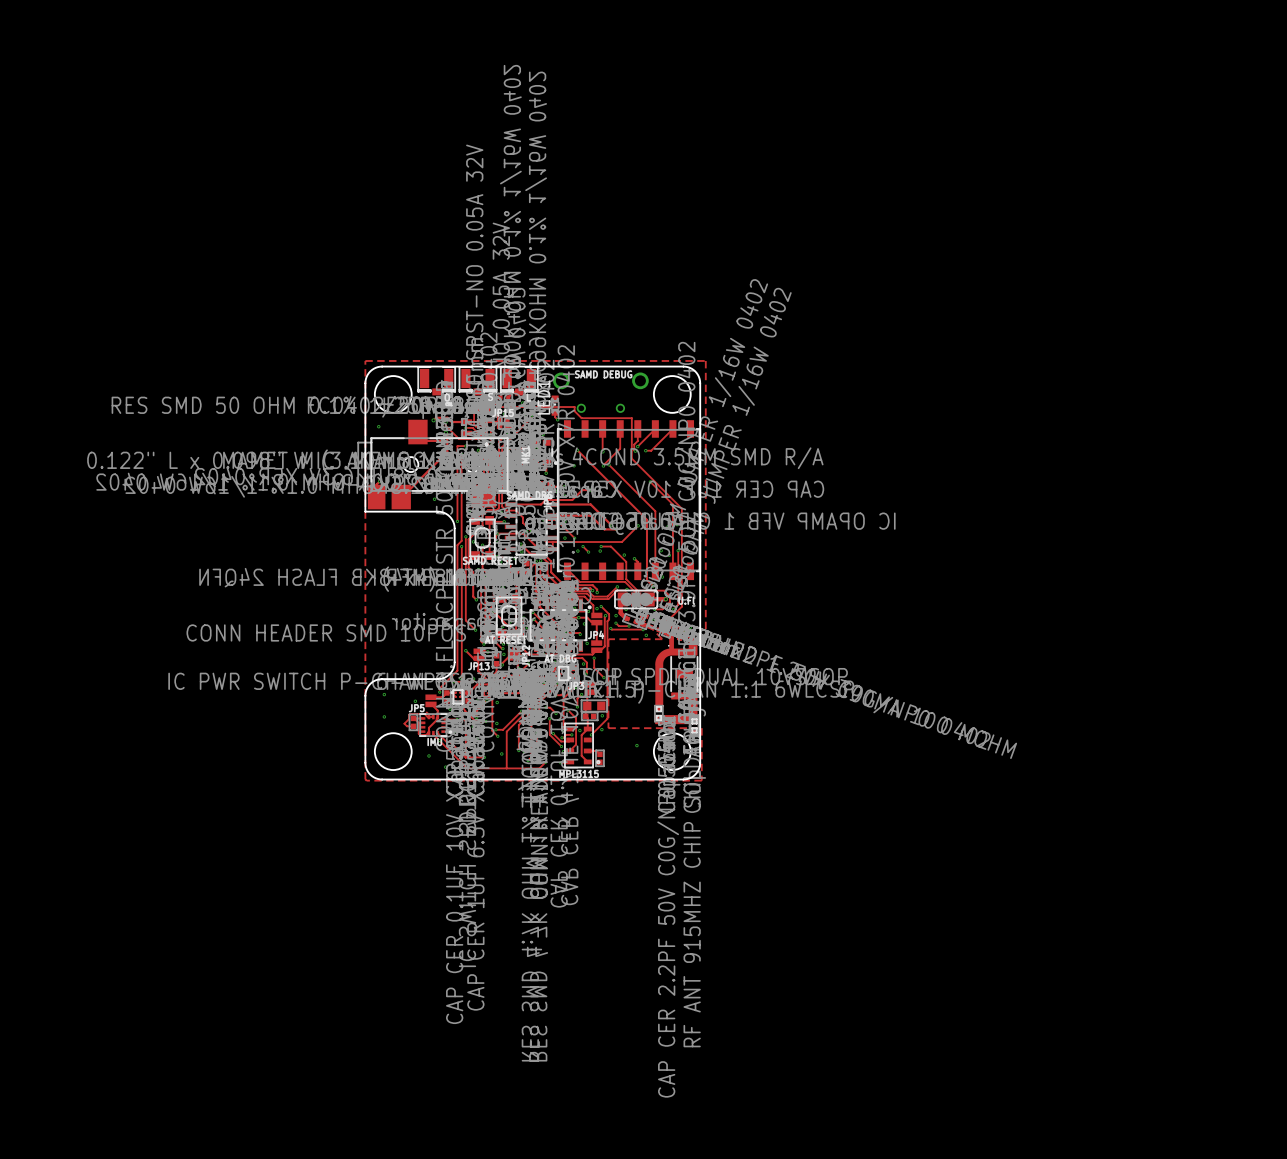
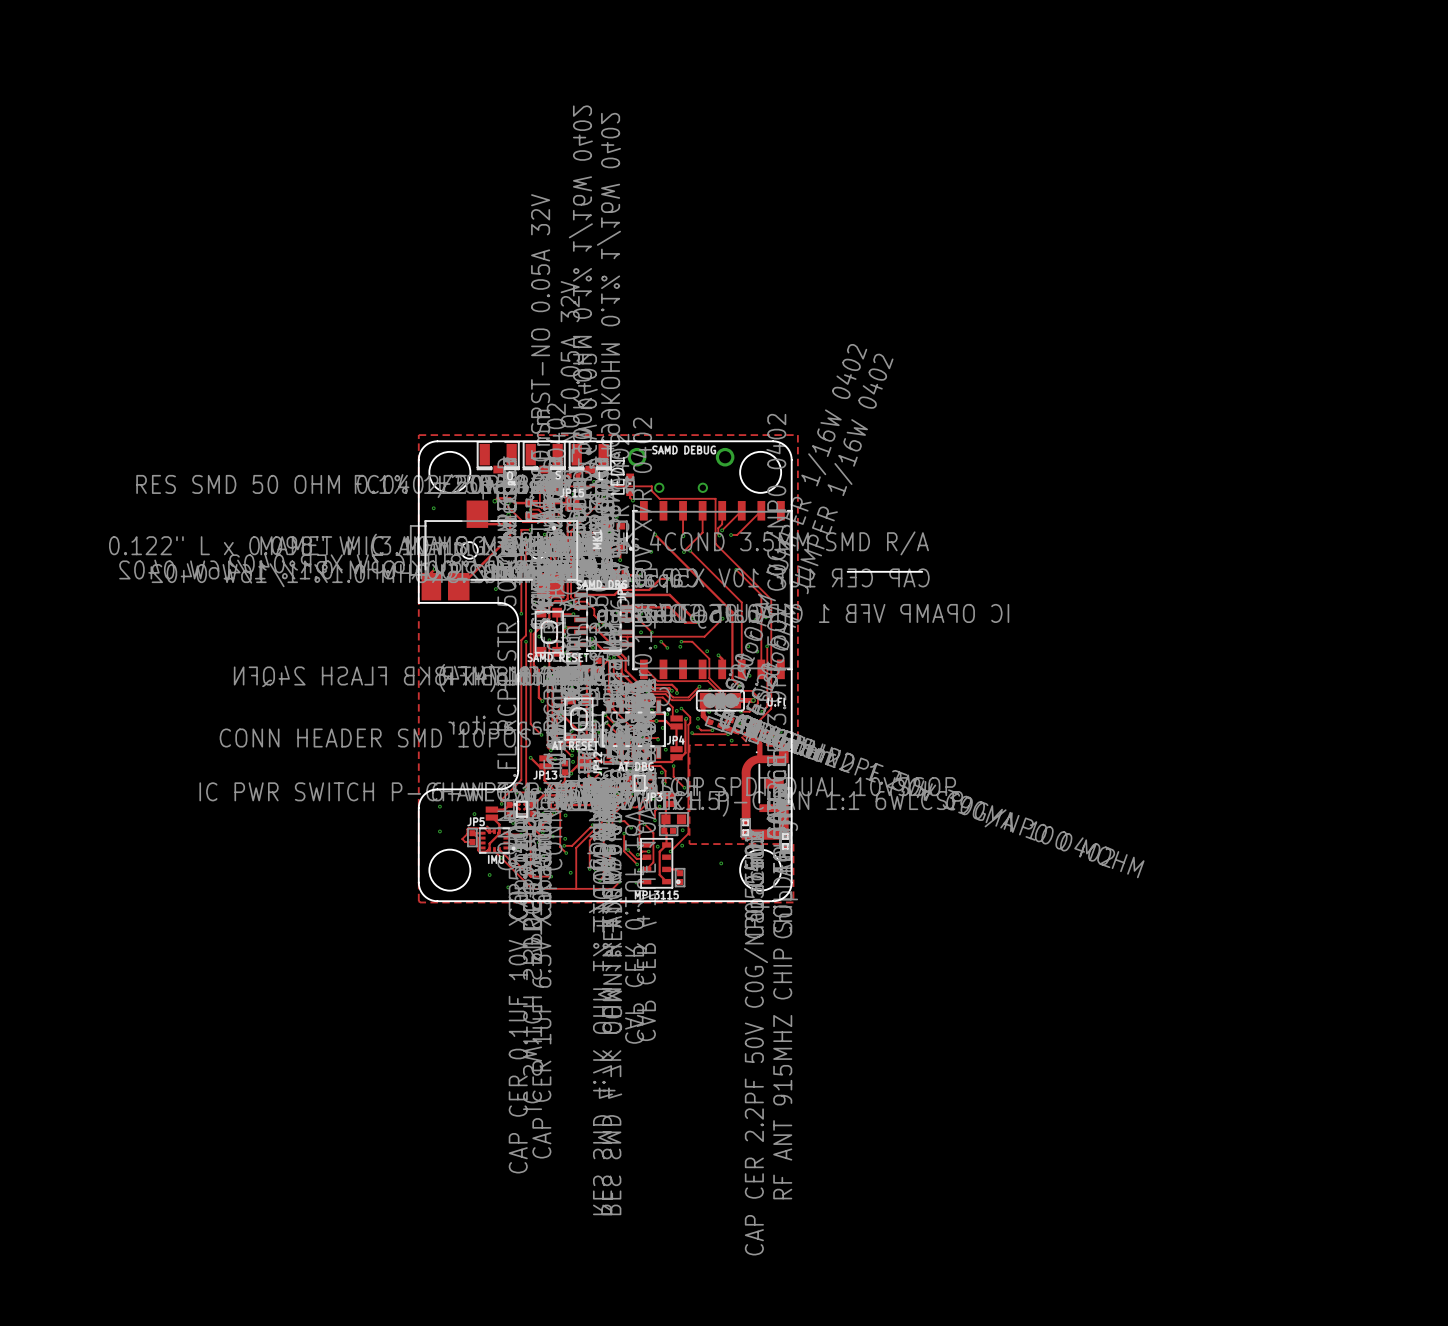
board edge: none -> (847, 571) (922, 571)

